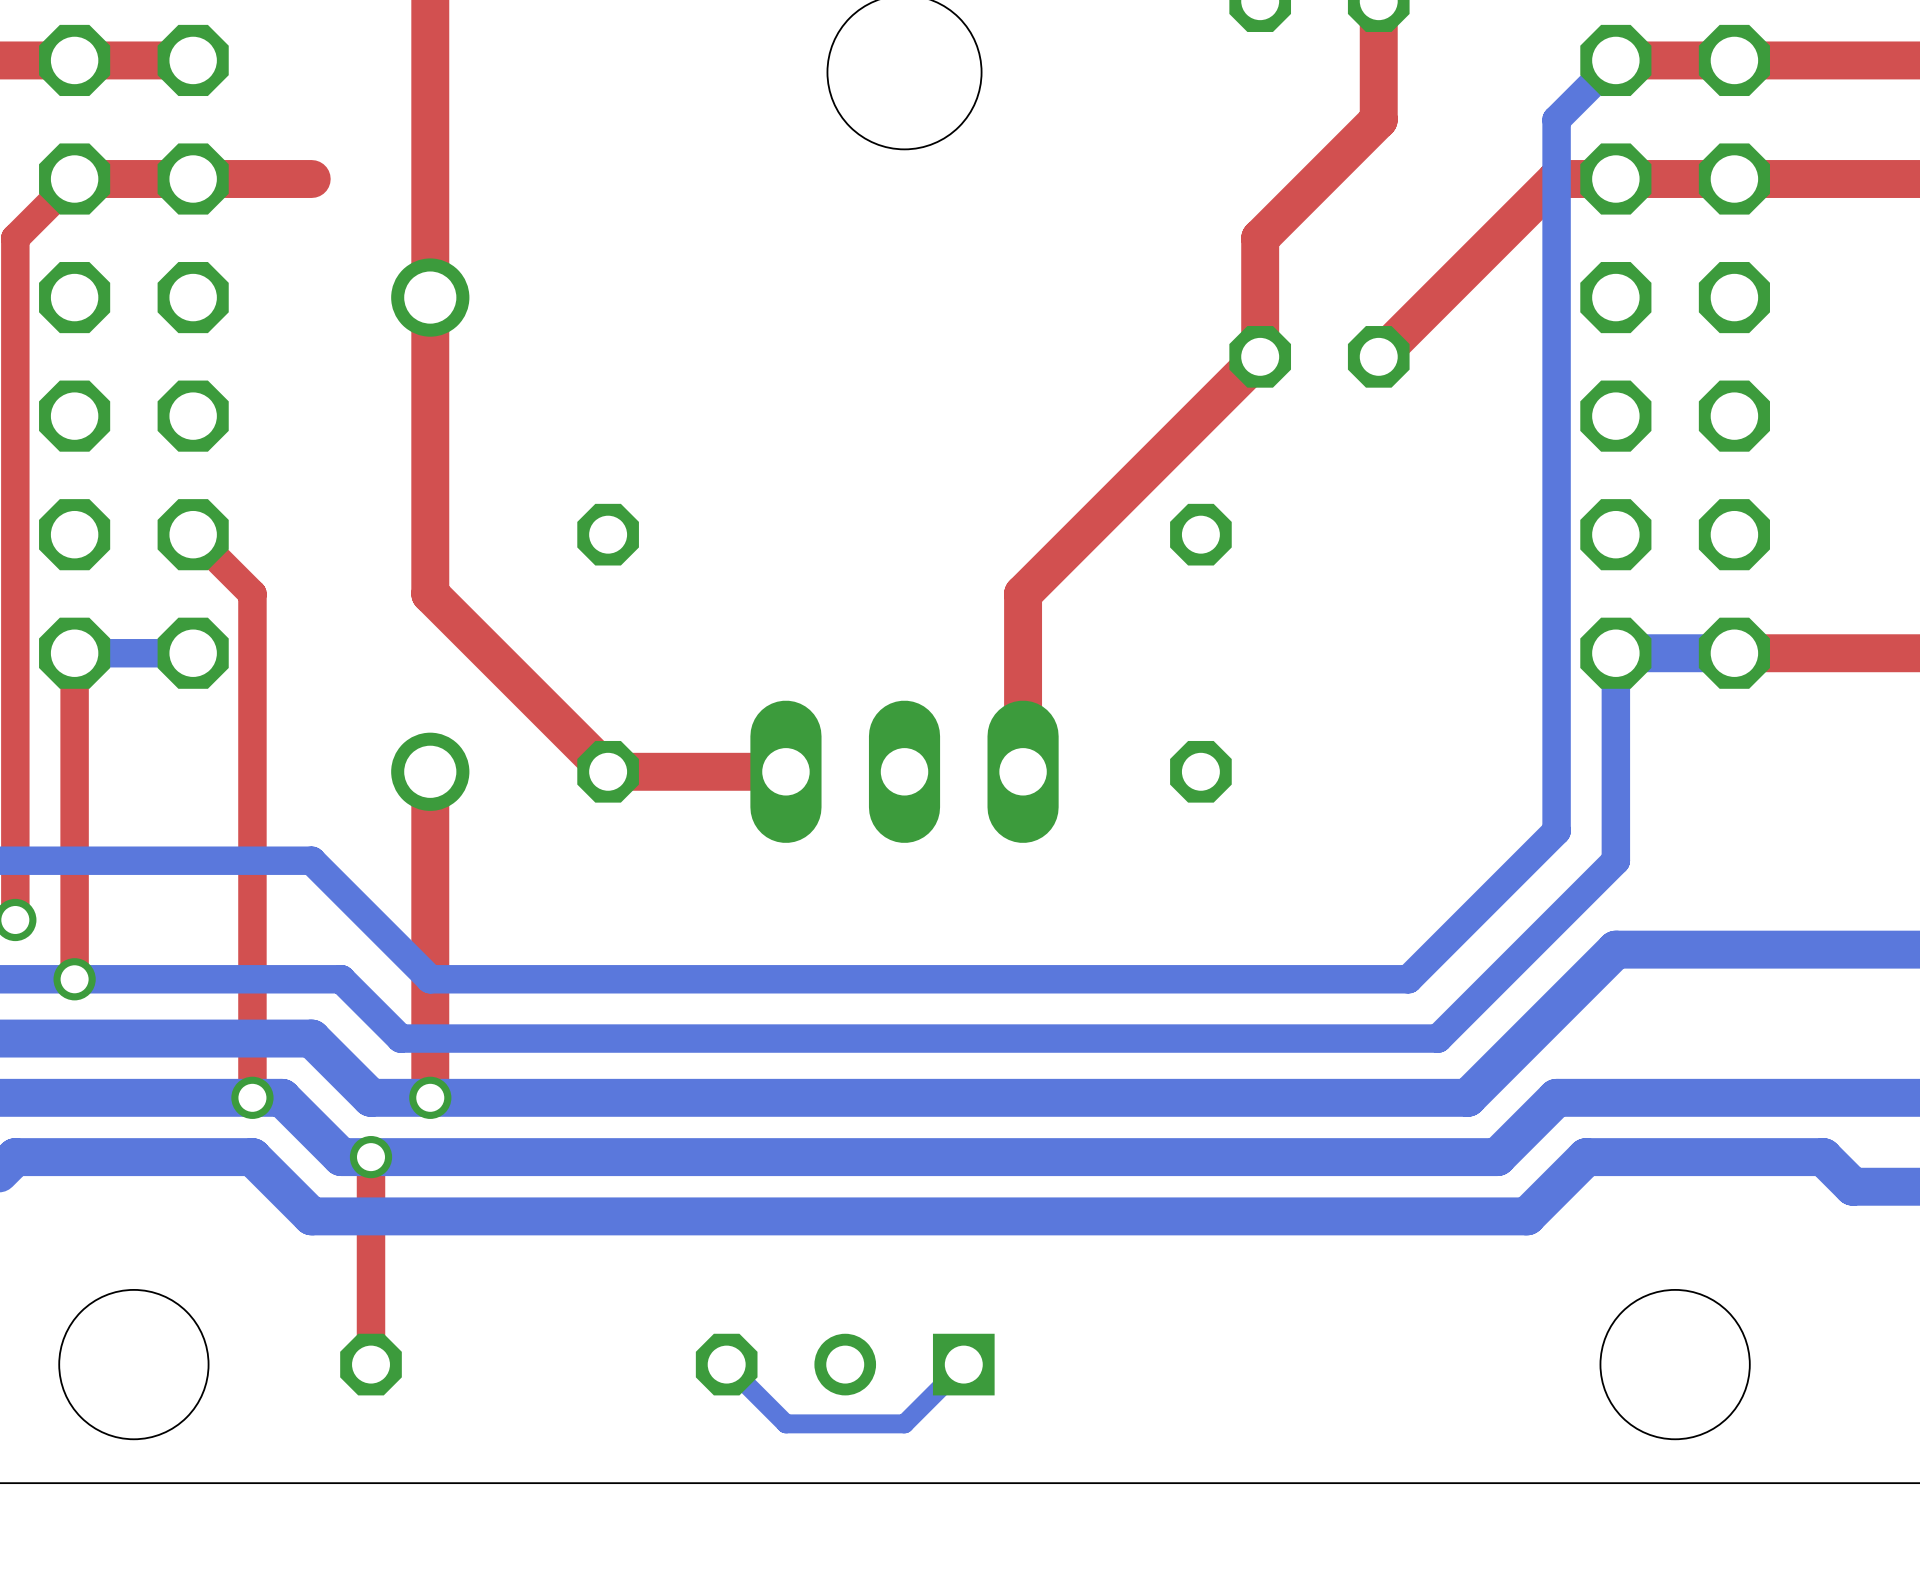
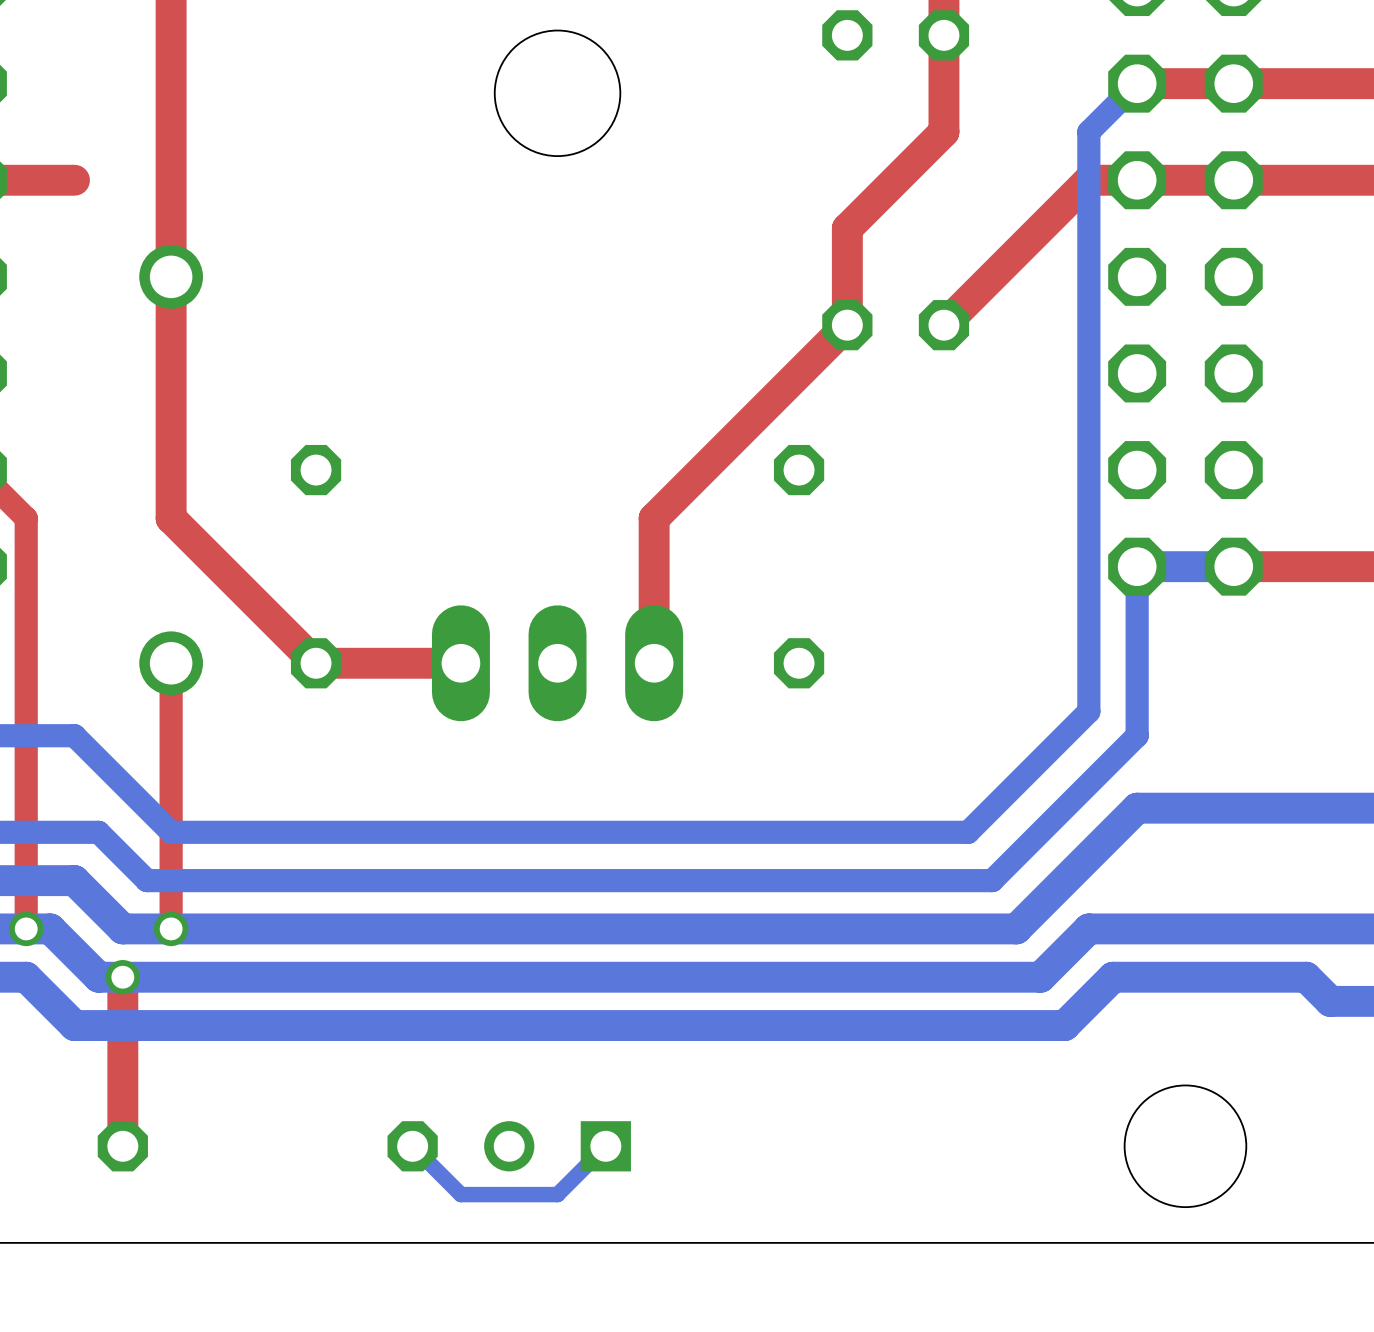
top track width: thick (430, 771) (430, 1097) -> thin (171, 663) (171, 928)
top track width: thin (371, 1157) (371, 1364) -> thick (122, 977) (122, 1146)

